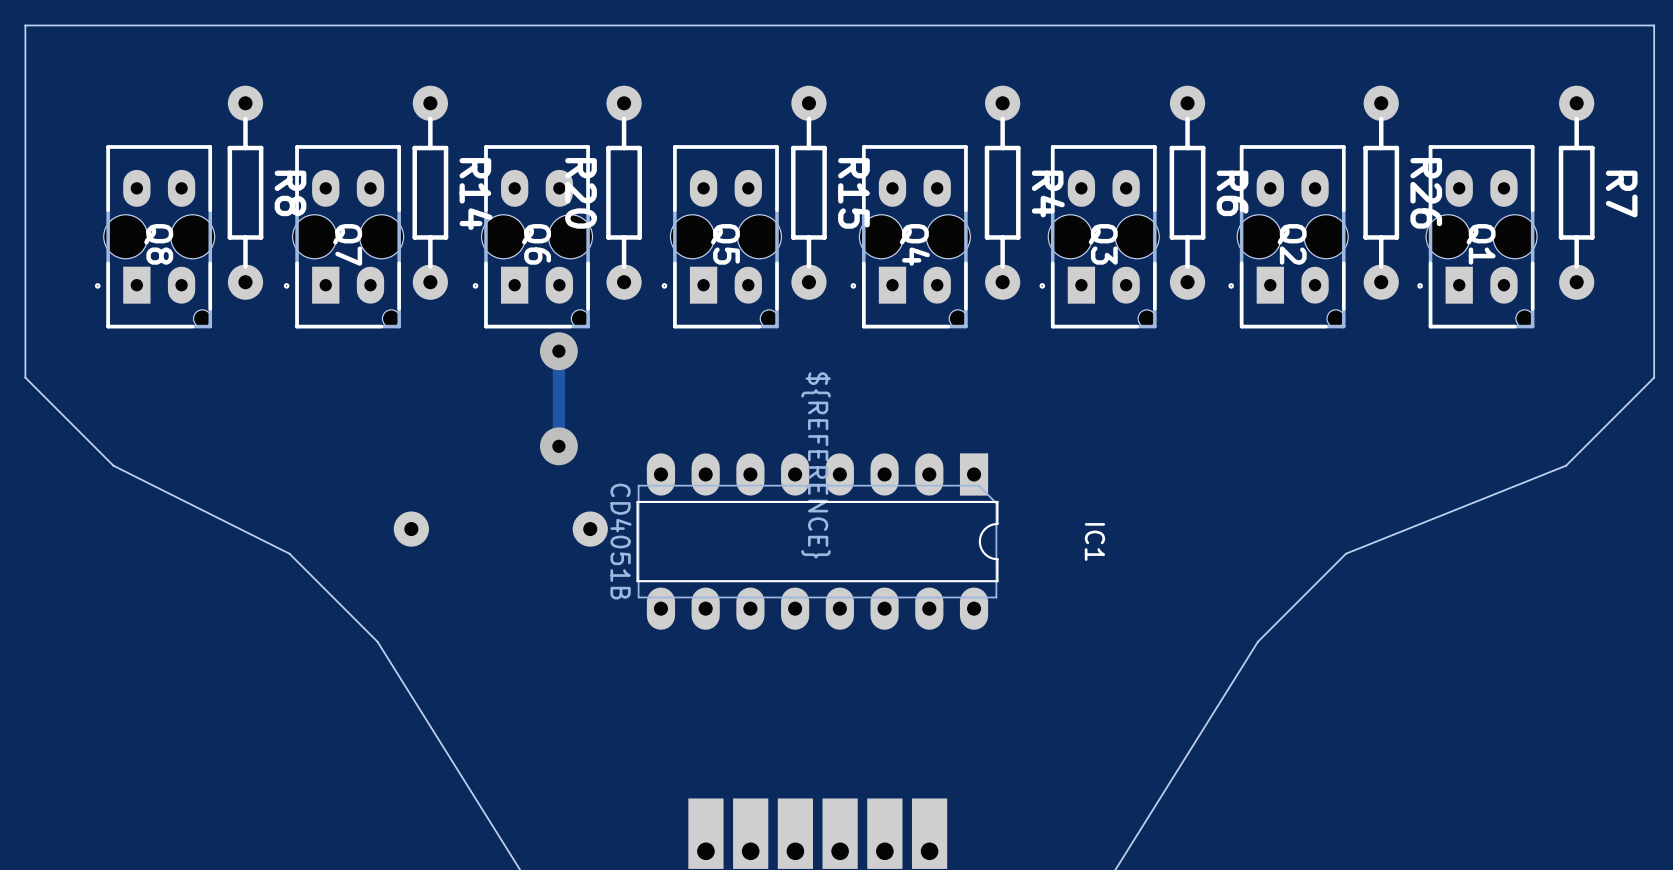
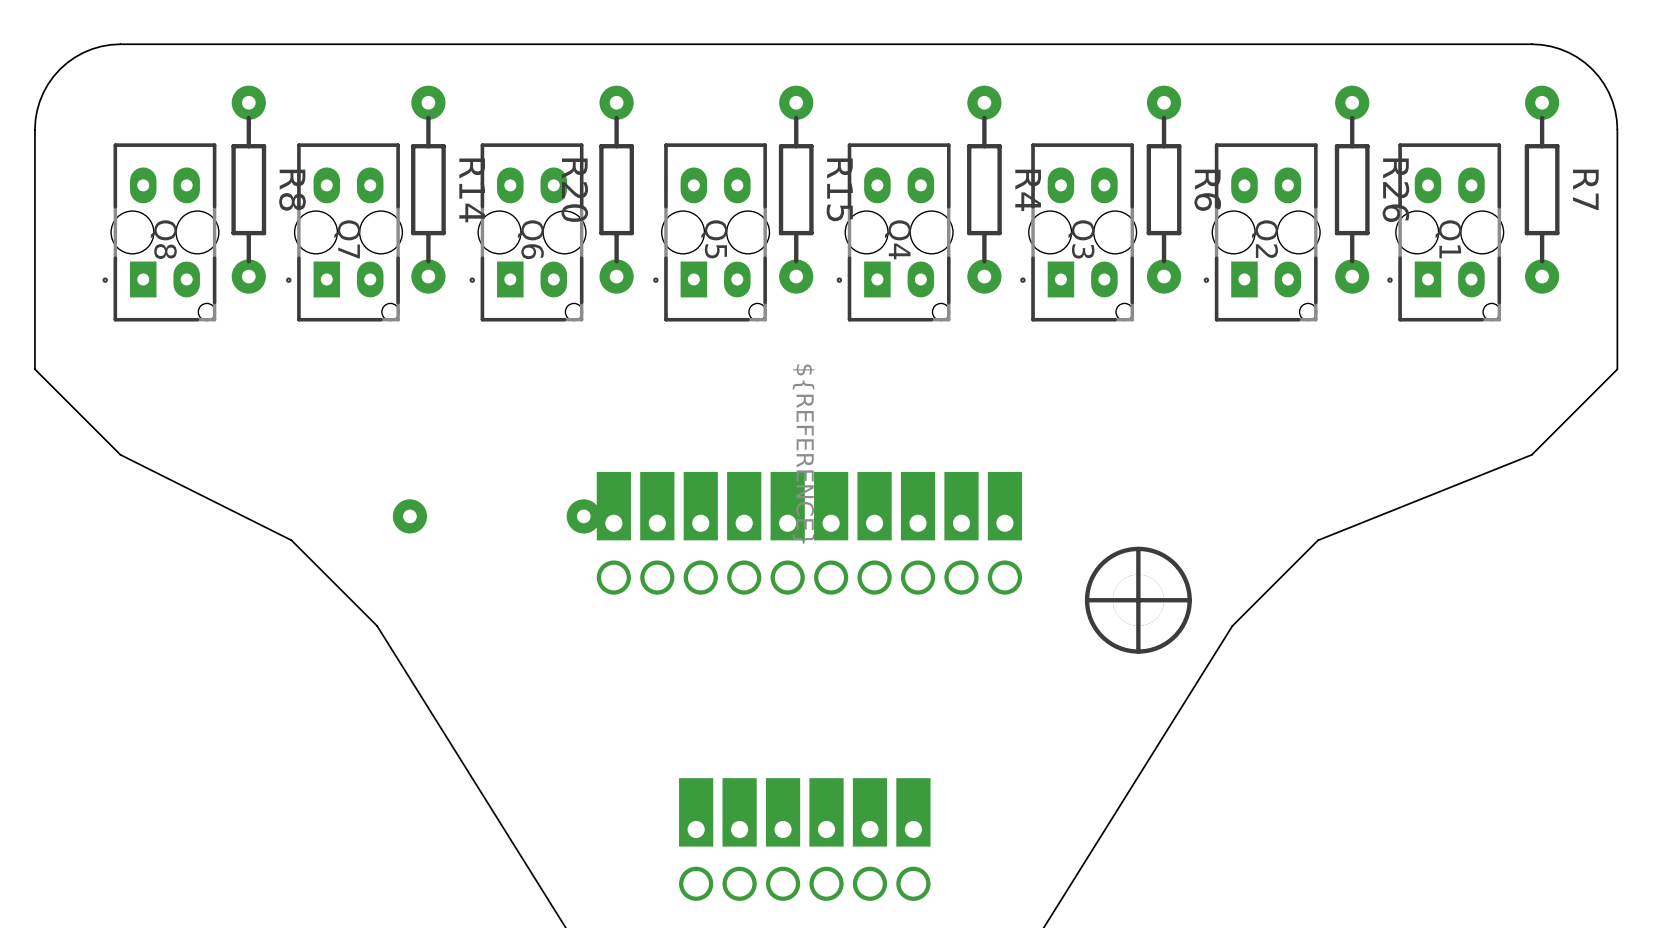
board edge: (1654, 131) (1654, 25) (25, 25) (25, 131) -> (1617, 129) (1615, 110) (1608, 92) (1592, 69) (1568, 52) (1550, 46) (1531, 44) (110, 44) (83, 52) (60, 69) (43, 92) (37, 110) (34, 129)
track: (558, 351) (558, 446) -> none
via: (558, 351) -> none
via: (558, 446) -> none
IC1: CD4051B (817, 541) -> none
part: none -> (809, 533)
part: none -> (1138, 600)

